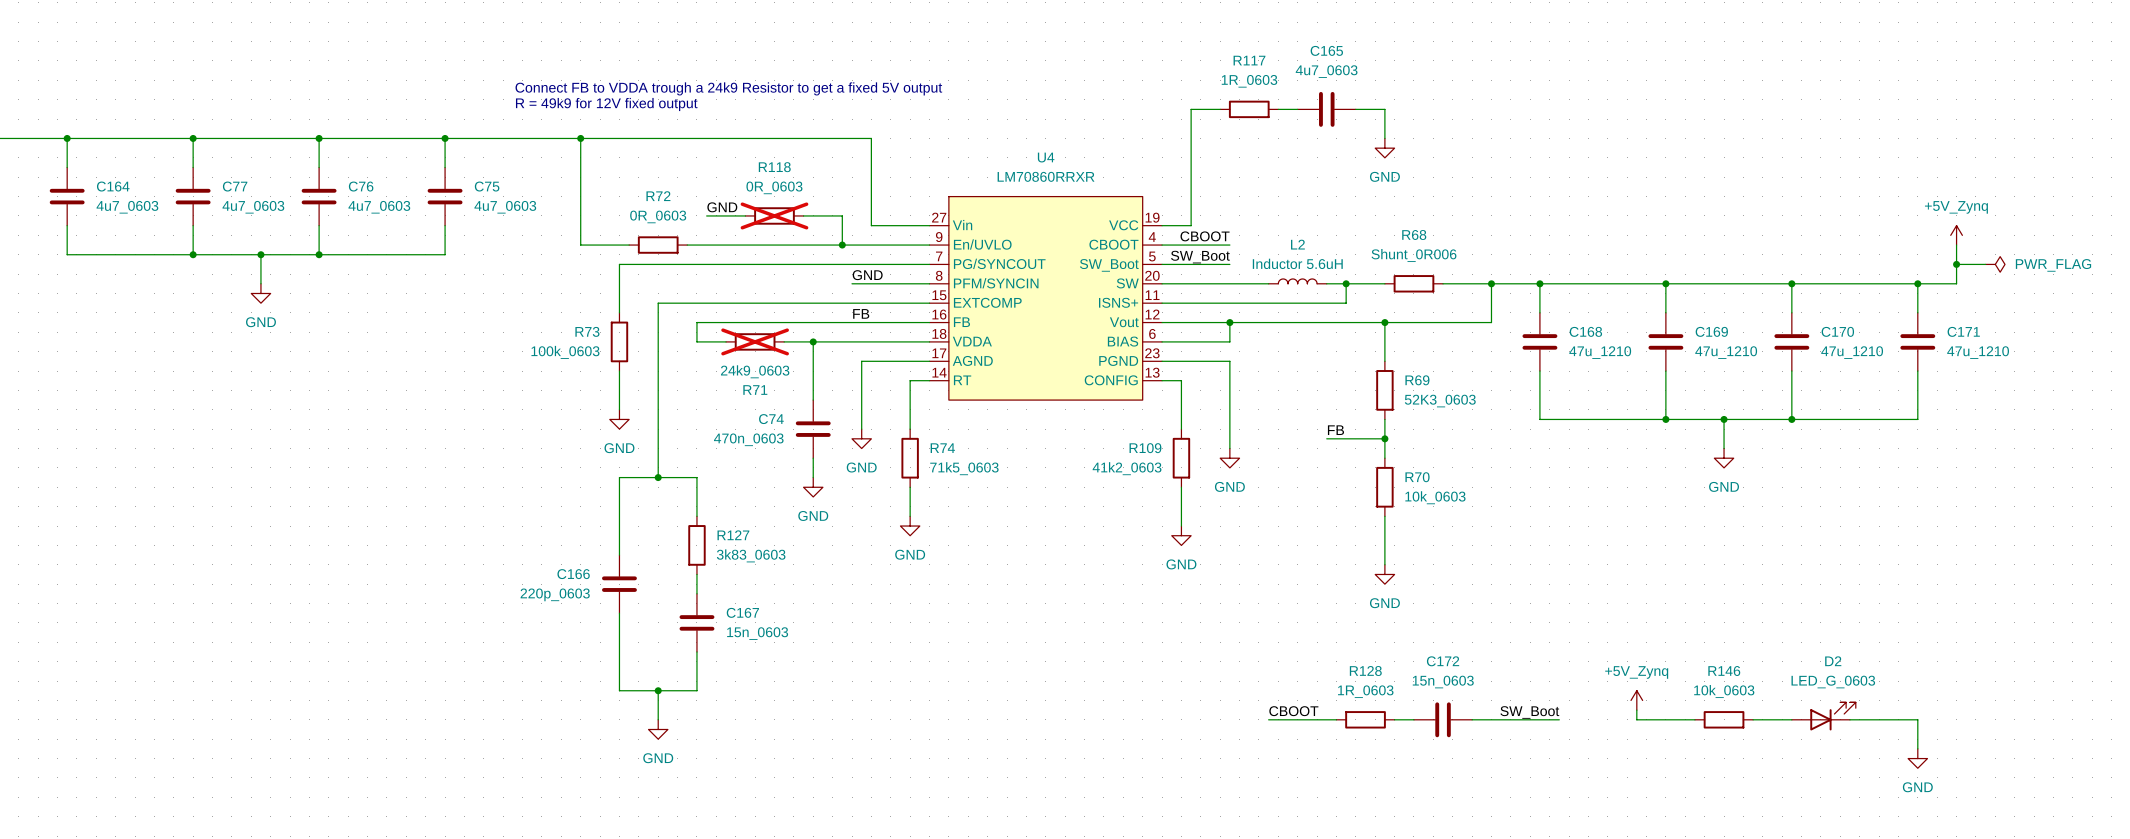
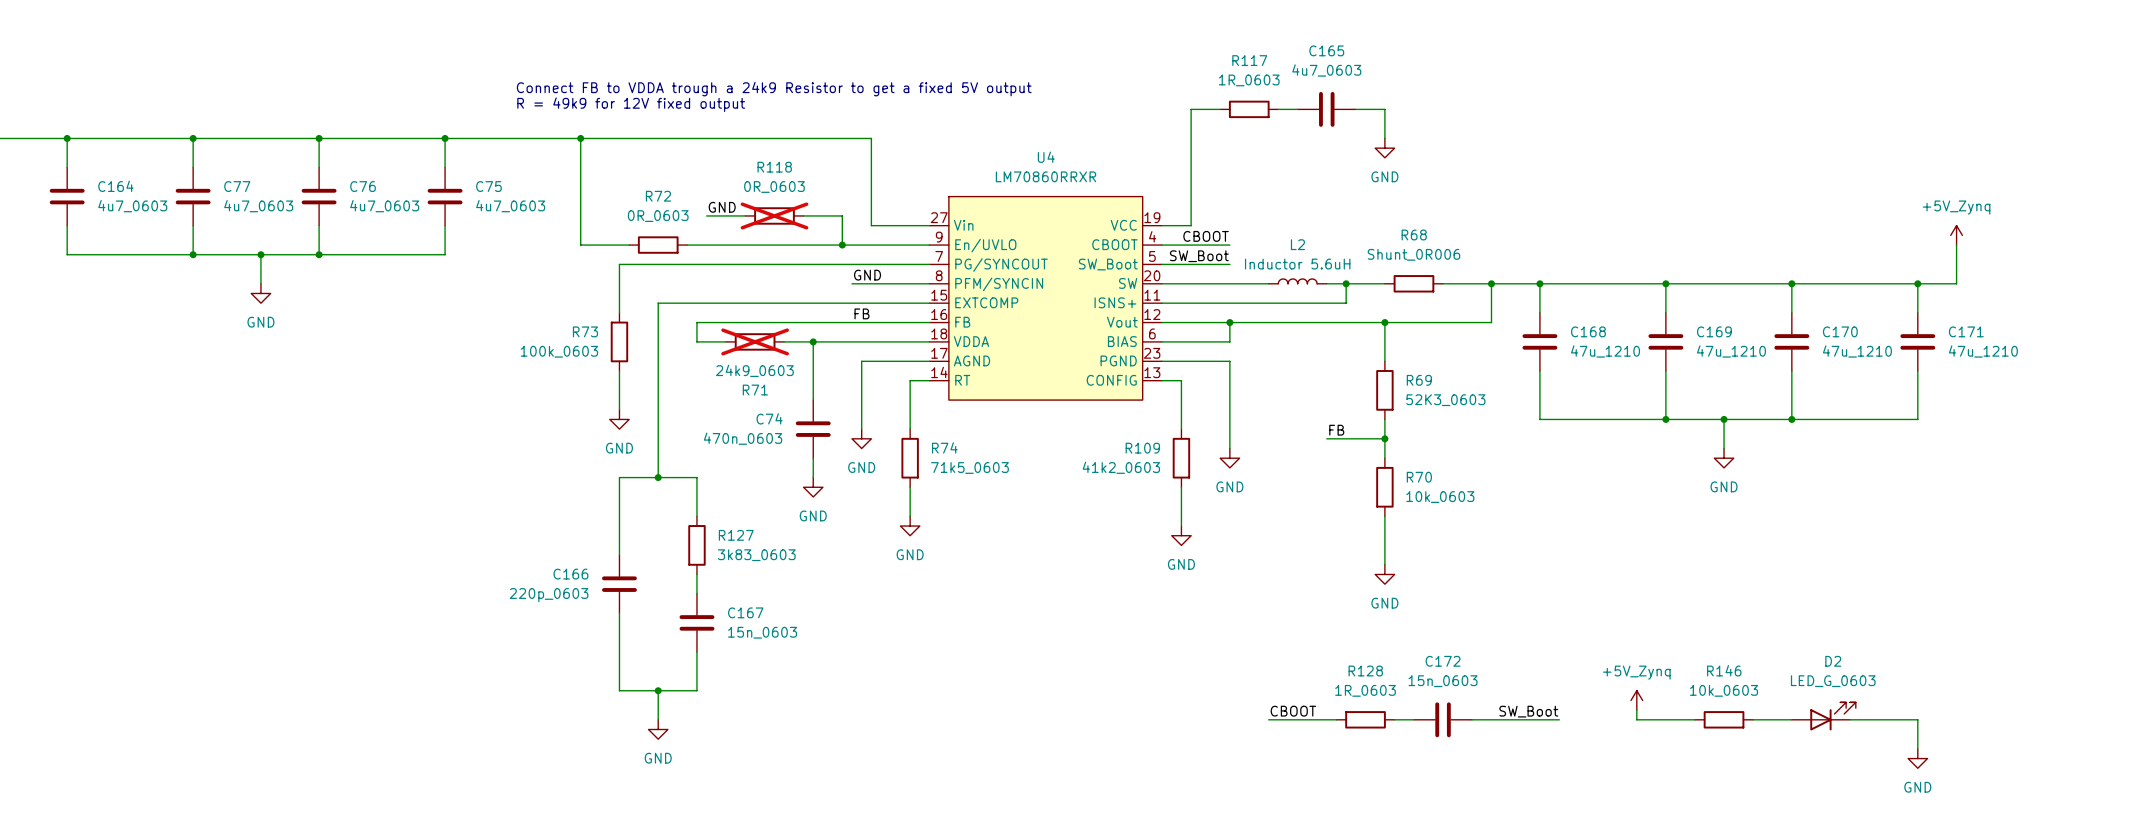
wire: (1956, 264) (1985, 264) -> none
junction: (1956, 264) -> none
power symbol: PWR_FLAG (1995, 264) -> none

